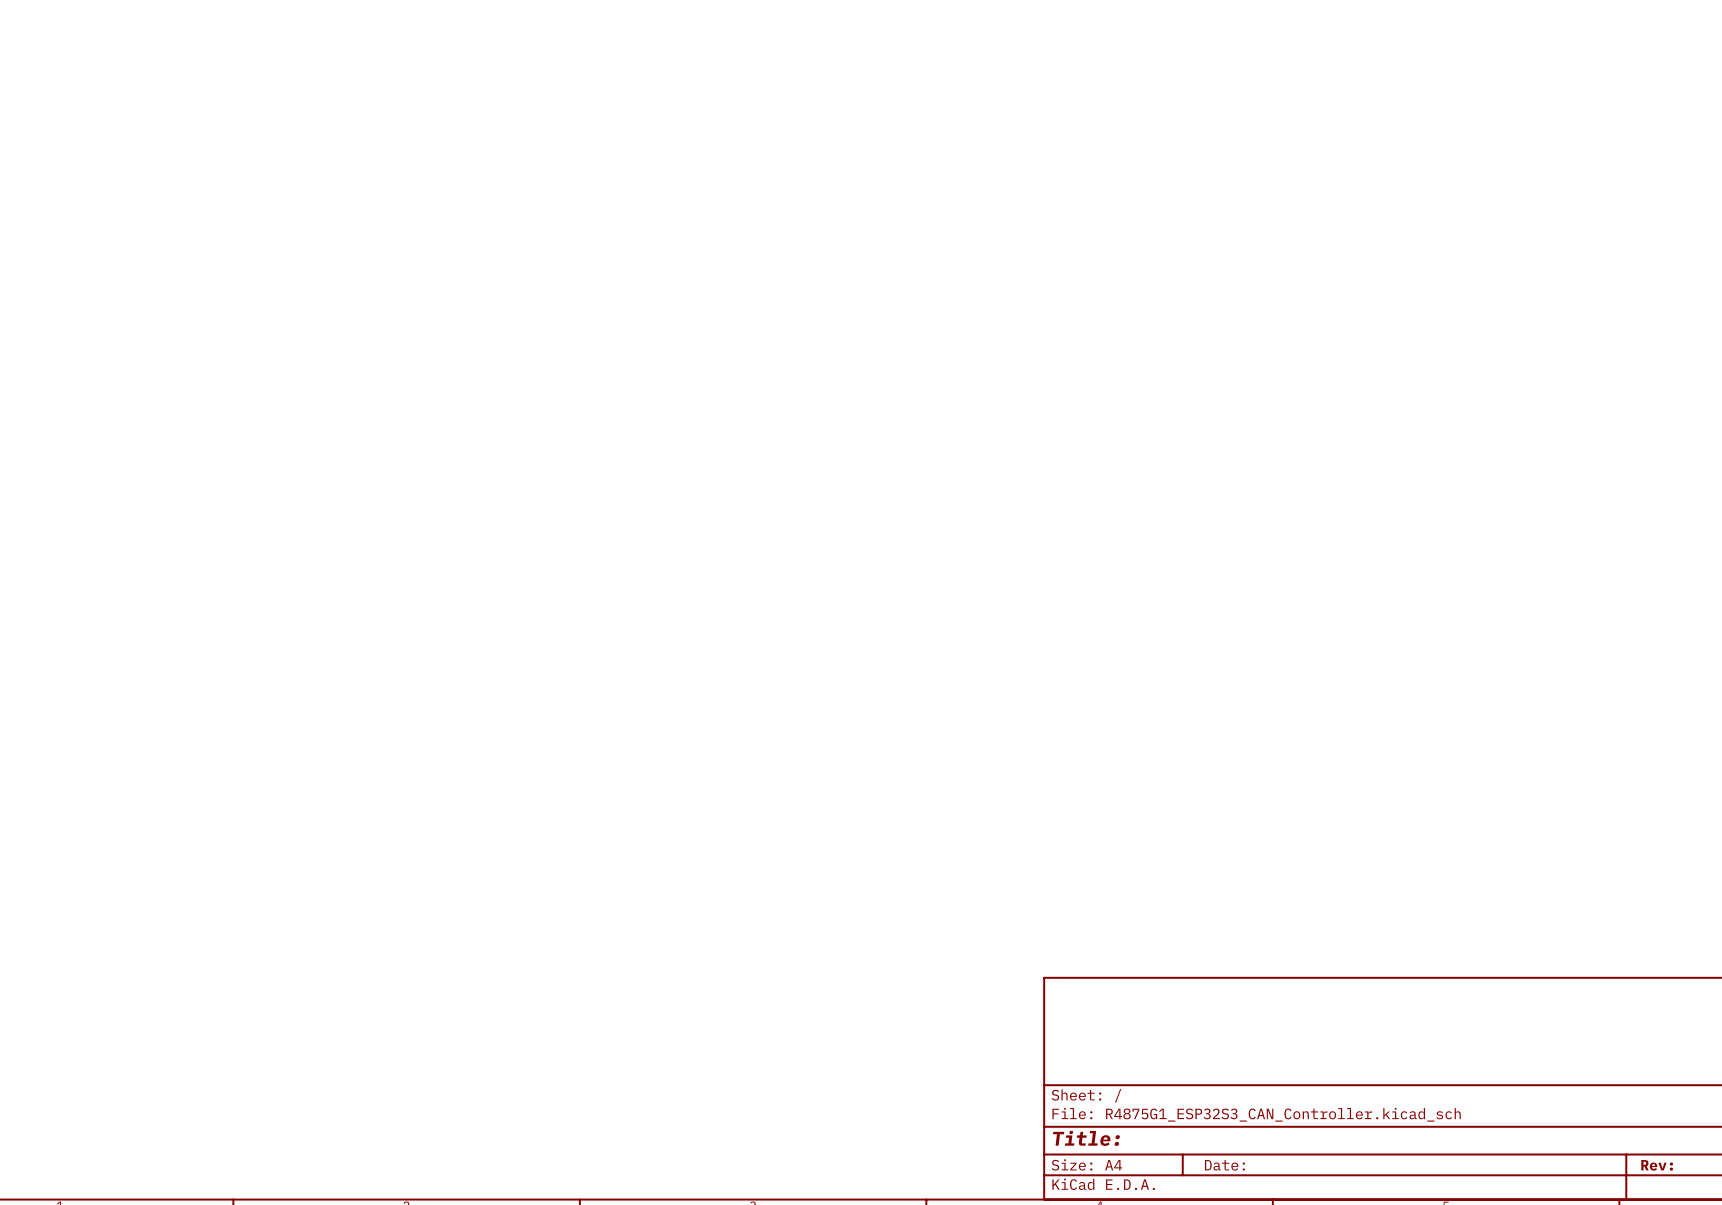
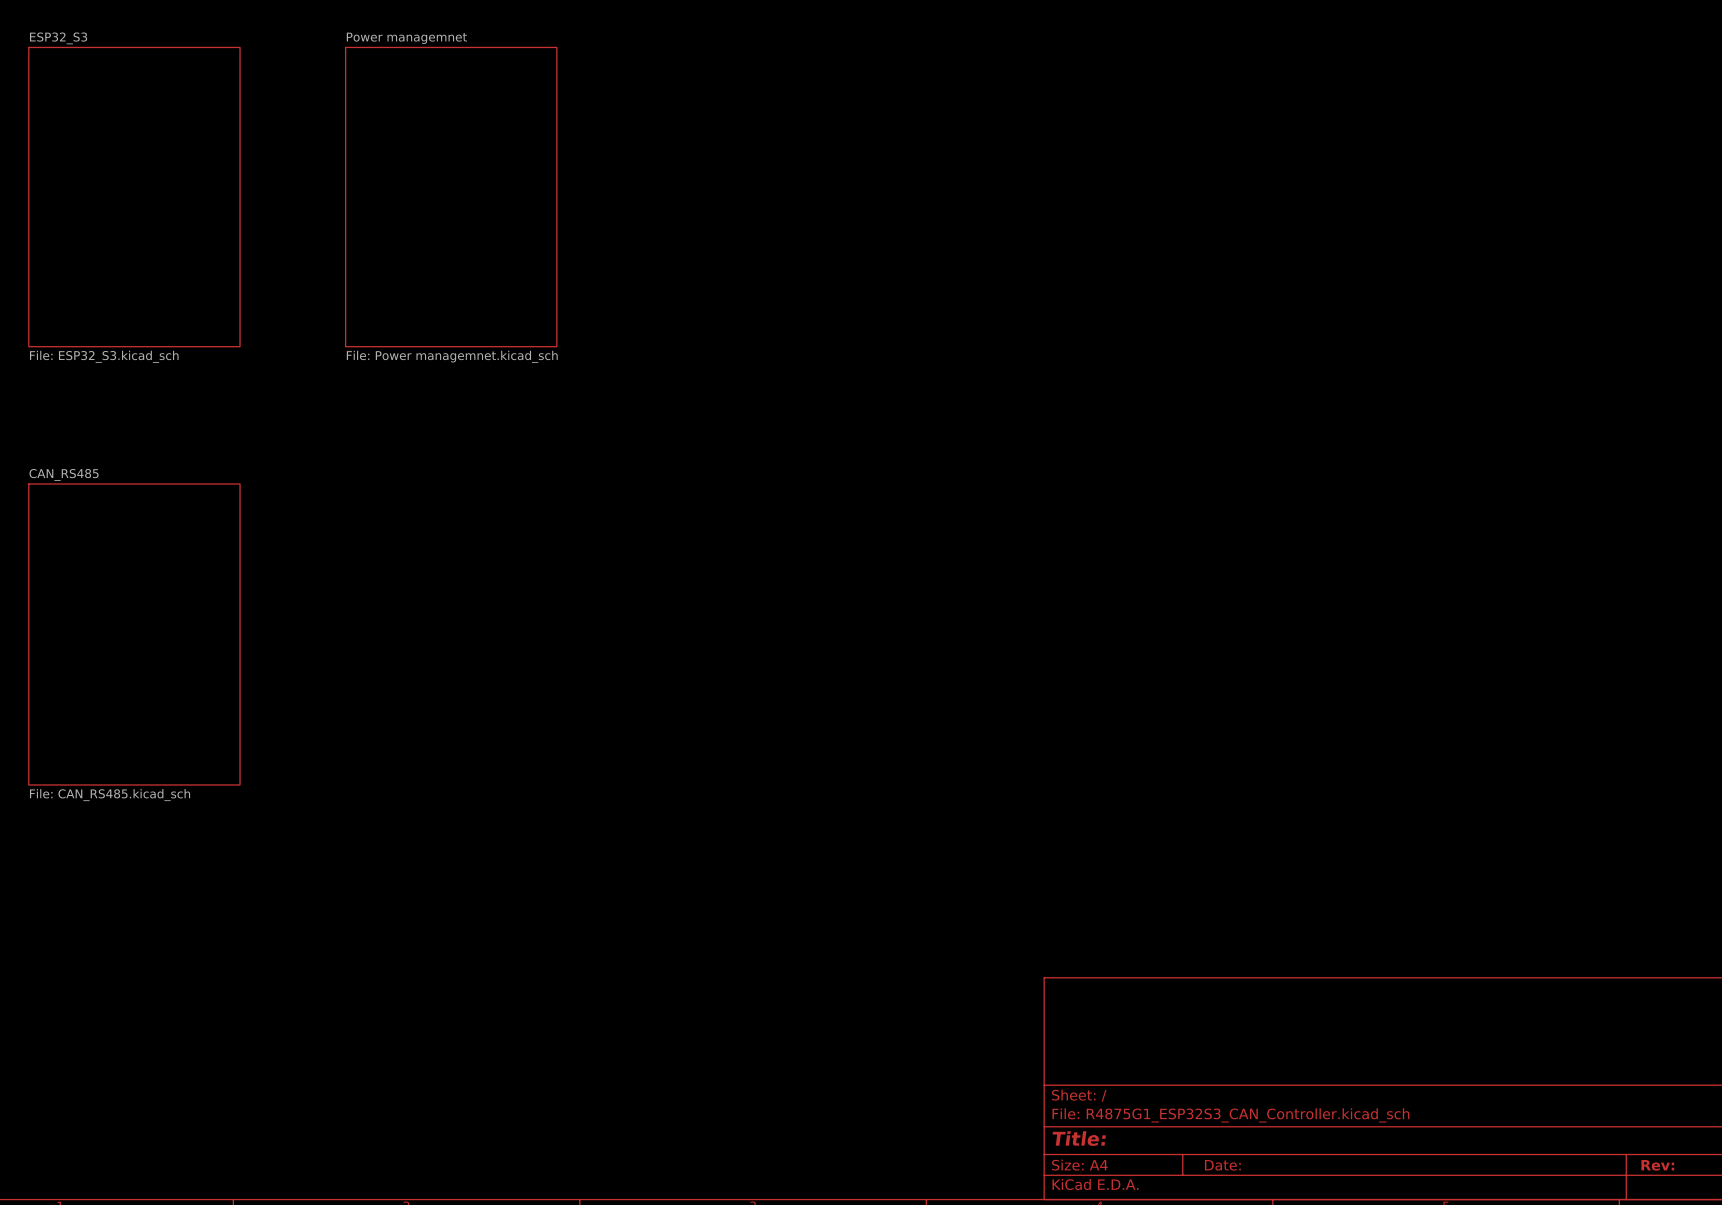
sheet ESP32_S3: none -> File: ESP32_S3.kicad_sch (134, 197)
sheet Power managemnet: none -> File: Power managemnet.kicad_sch (451, 197)
sheet CAN_RS485: none -> File: CAN_RS485.kicad_sch (134, 634)

